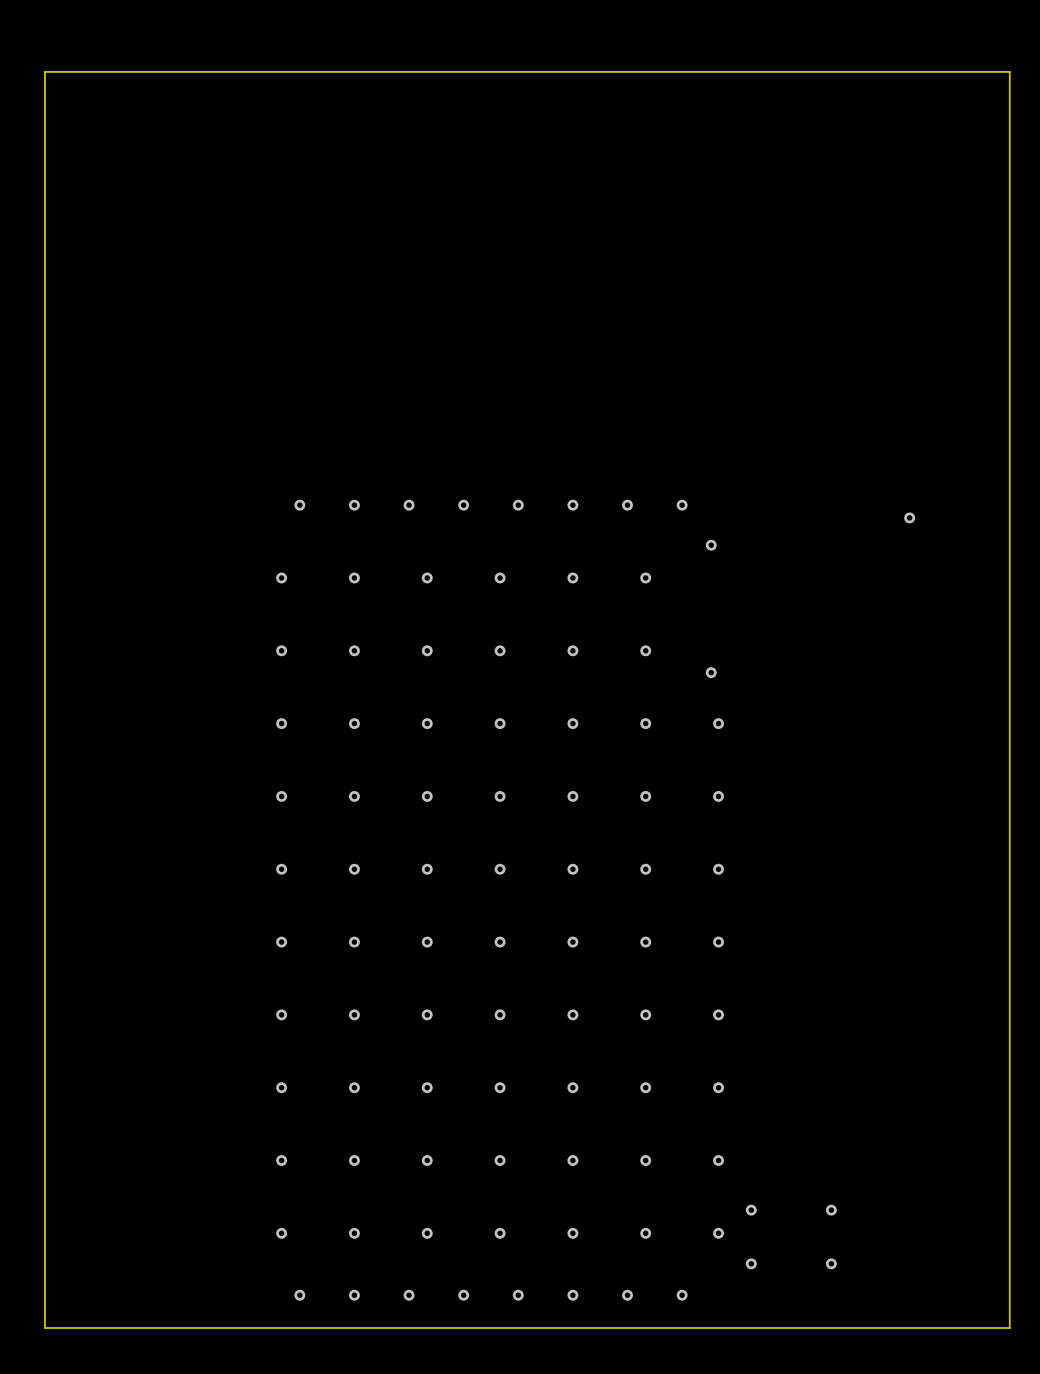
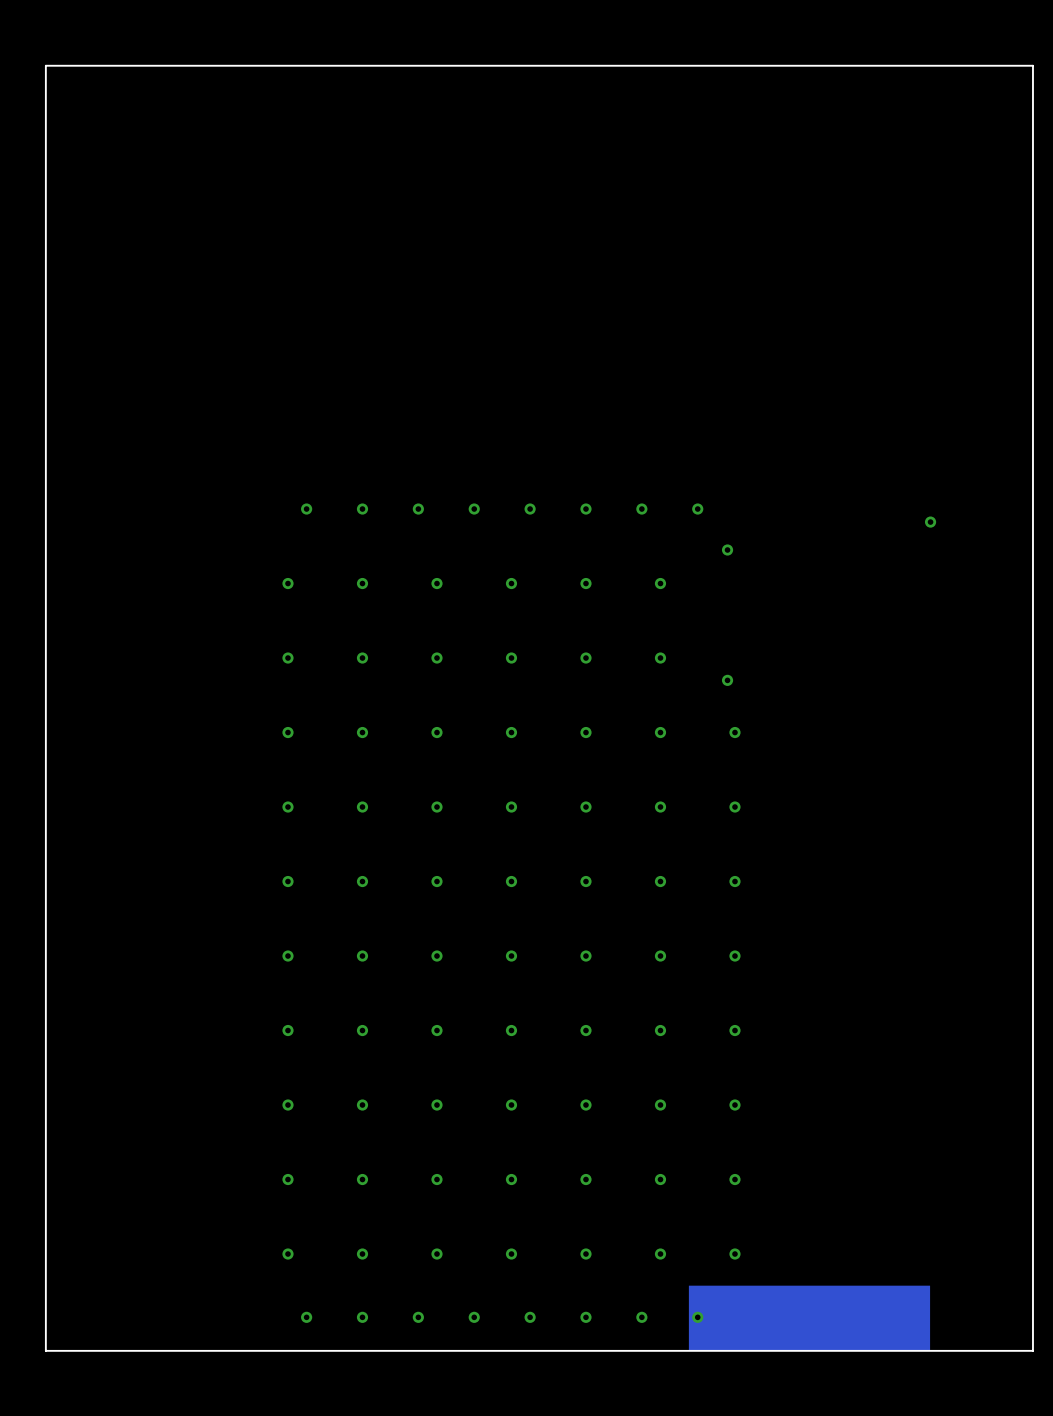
via: (751, 1210) -> none
via: (831, 1210) -> none
via: (751, 1263) -> none
via: (831, 1263) -> none
part: none -> (809, 1318)

